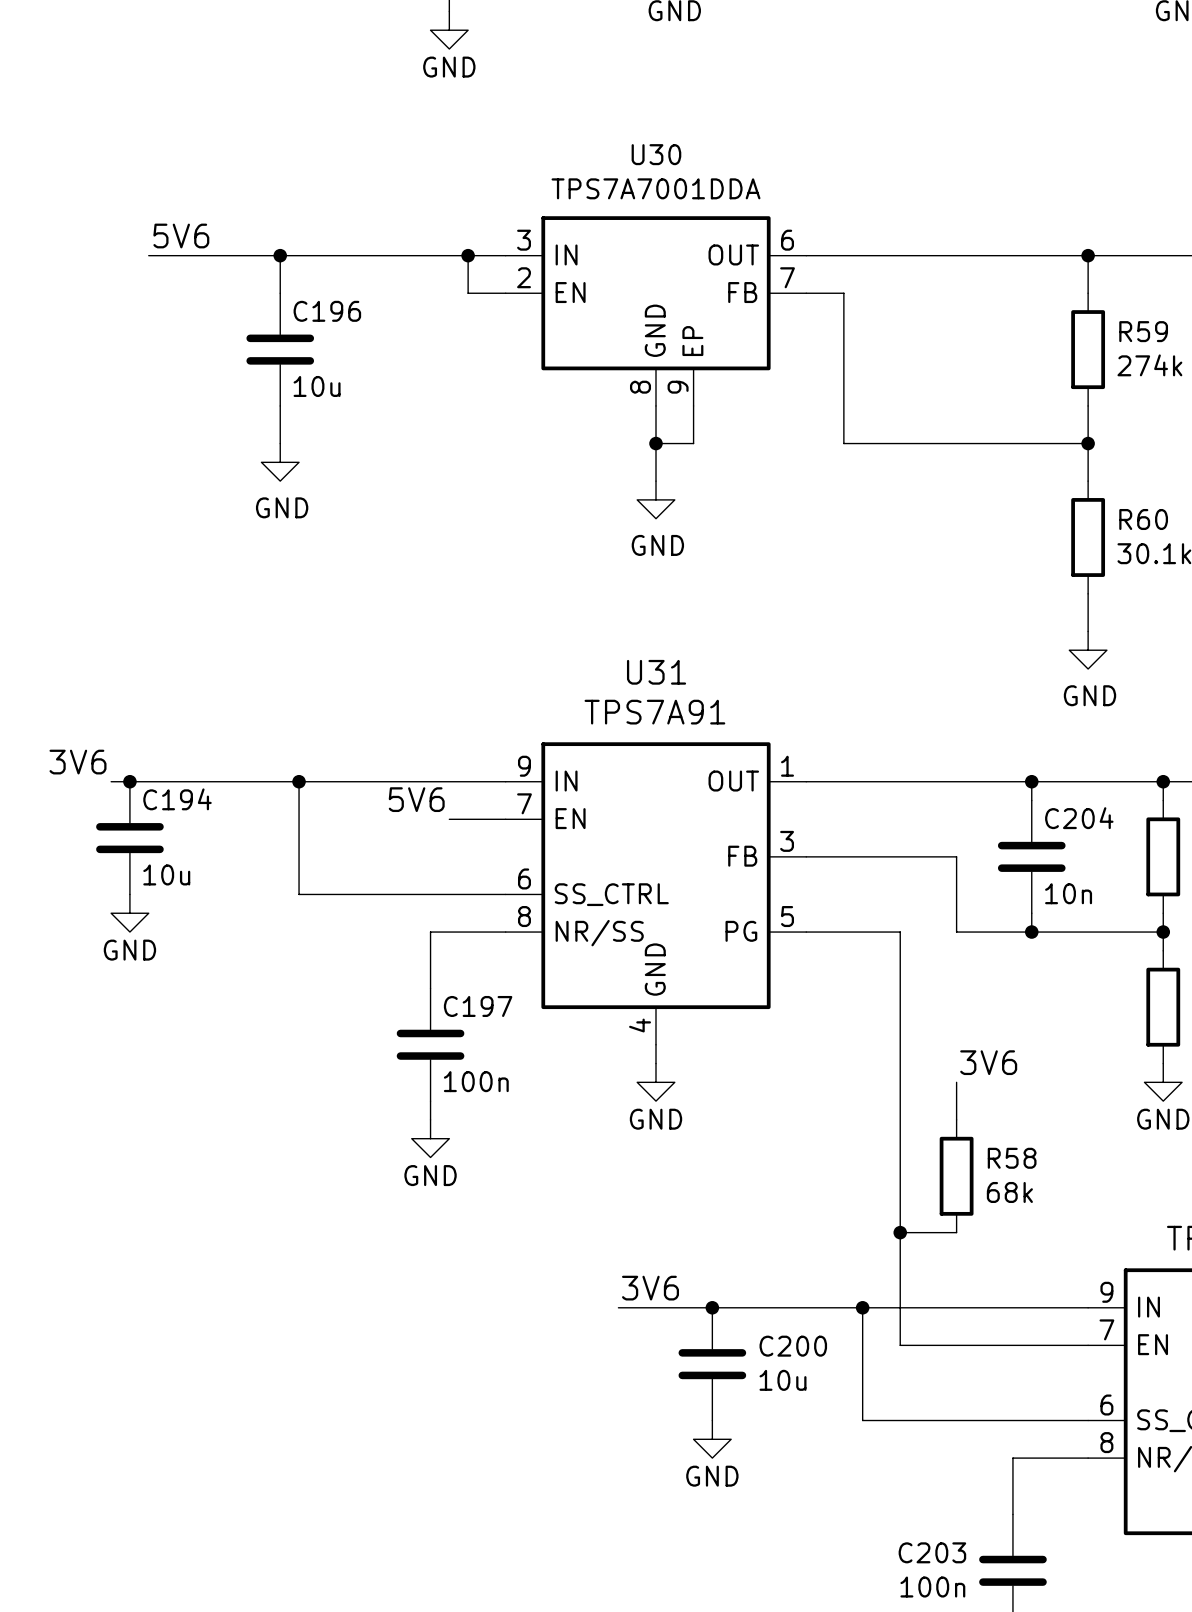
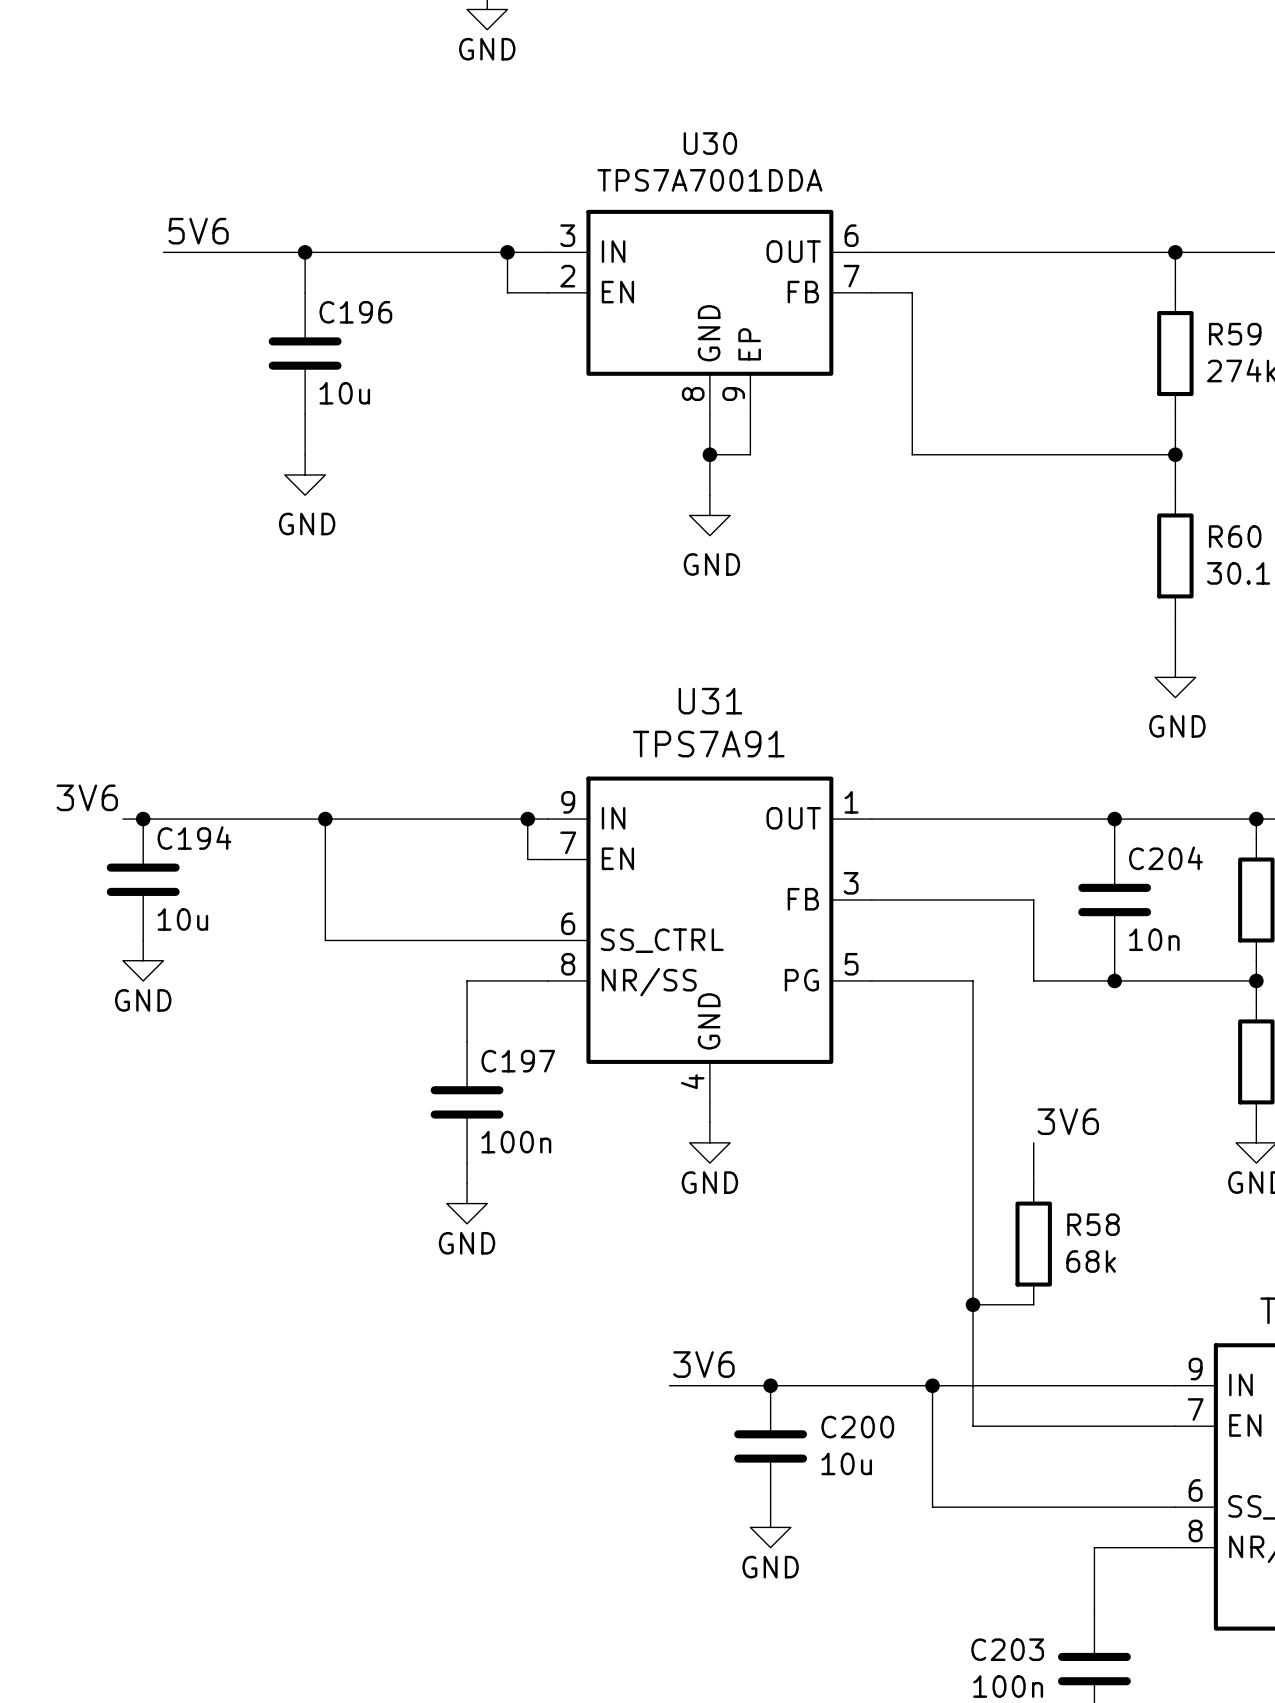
junction: none -> (527, 819)
label: 5V6 (416, 799) -> none
wire: (449, 819) (486, 819) -> (527, 819) (527, 859)

